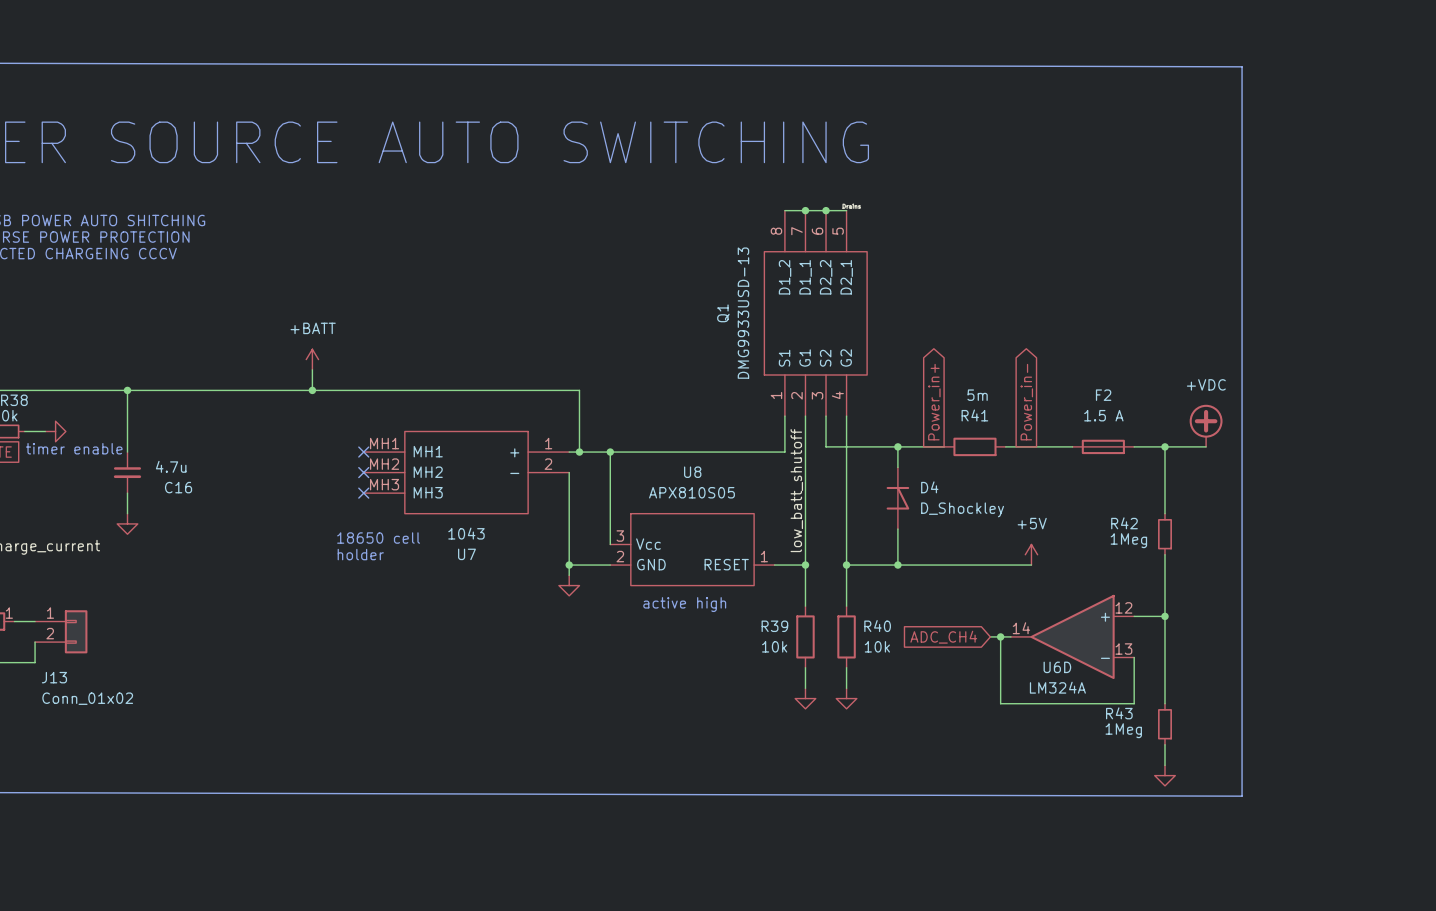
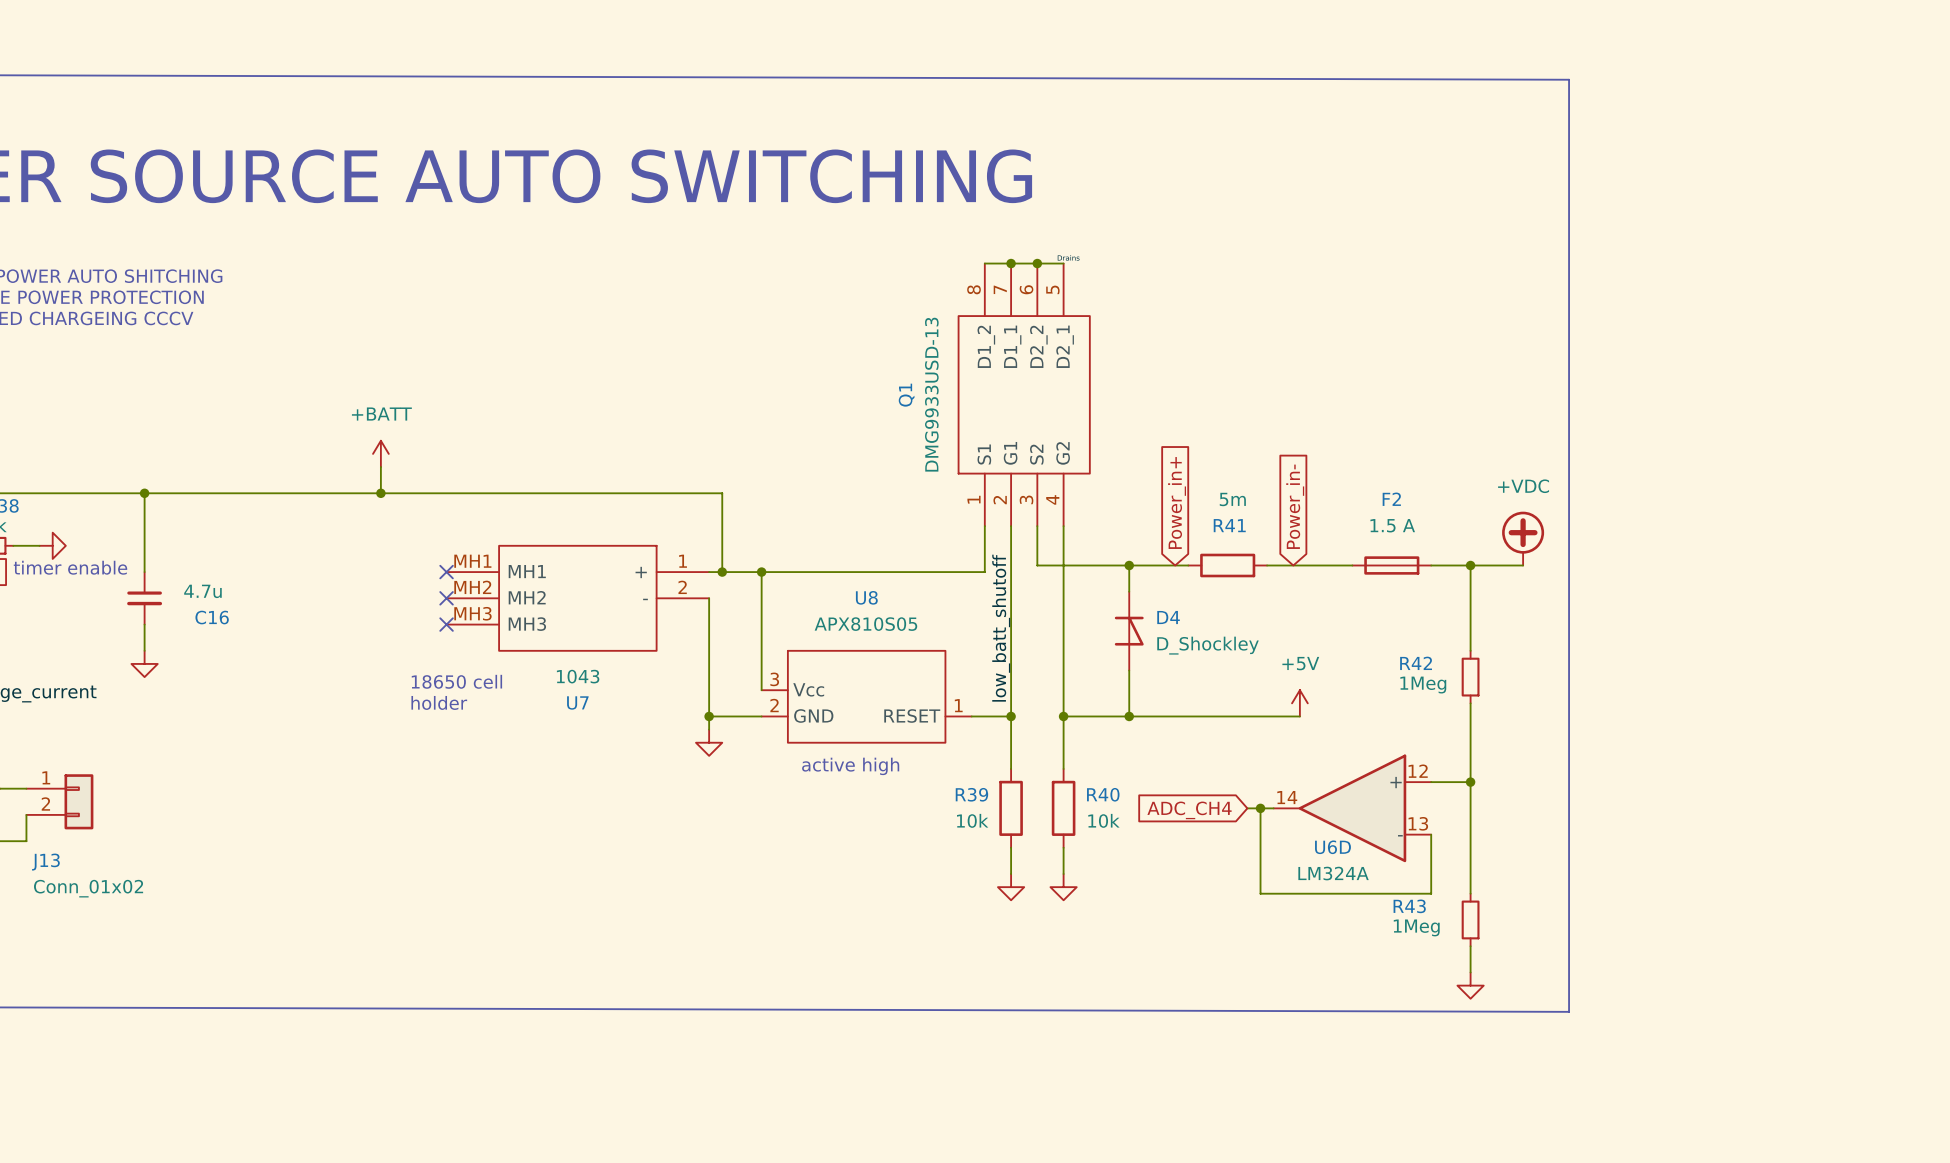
global label shape: output (934, 402) -> input (1177, 503)
global label shape: output (1026, 402) -> input (1295, 506)

